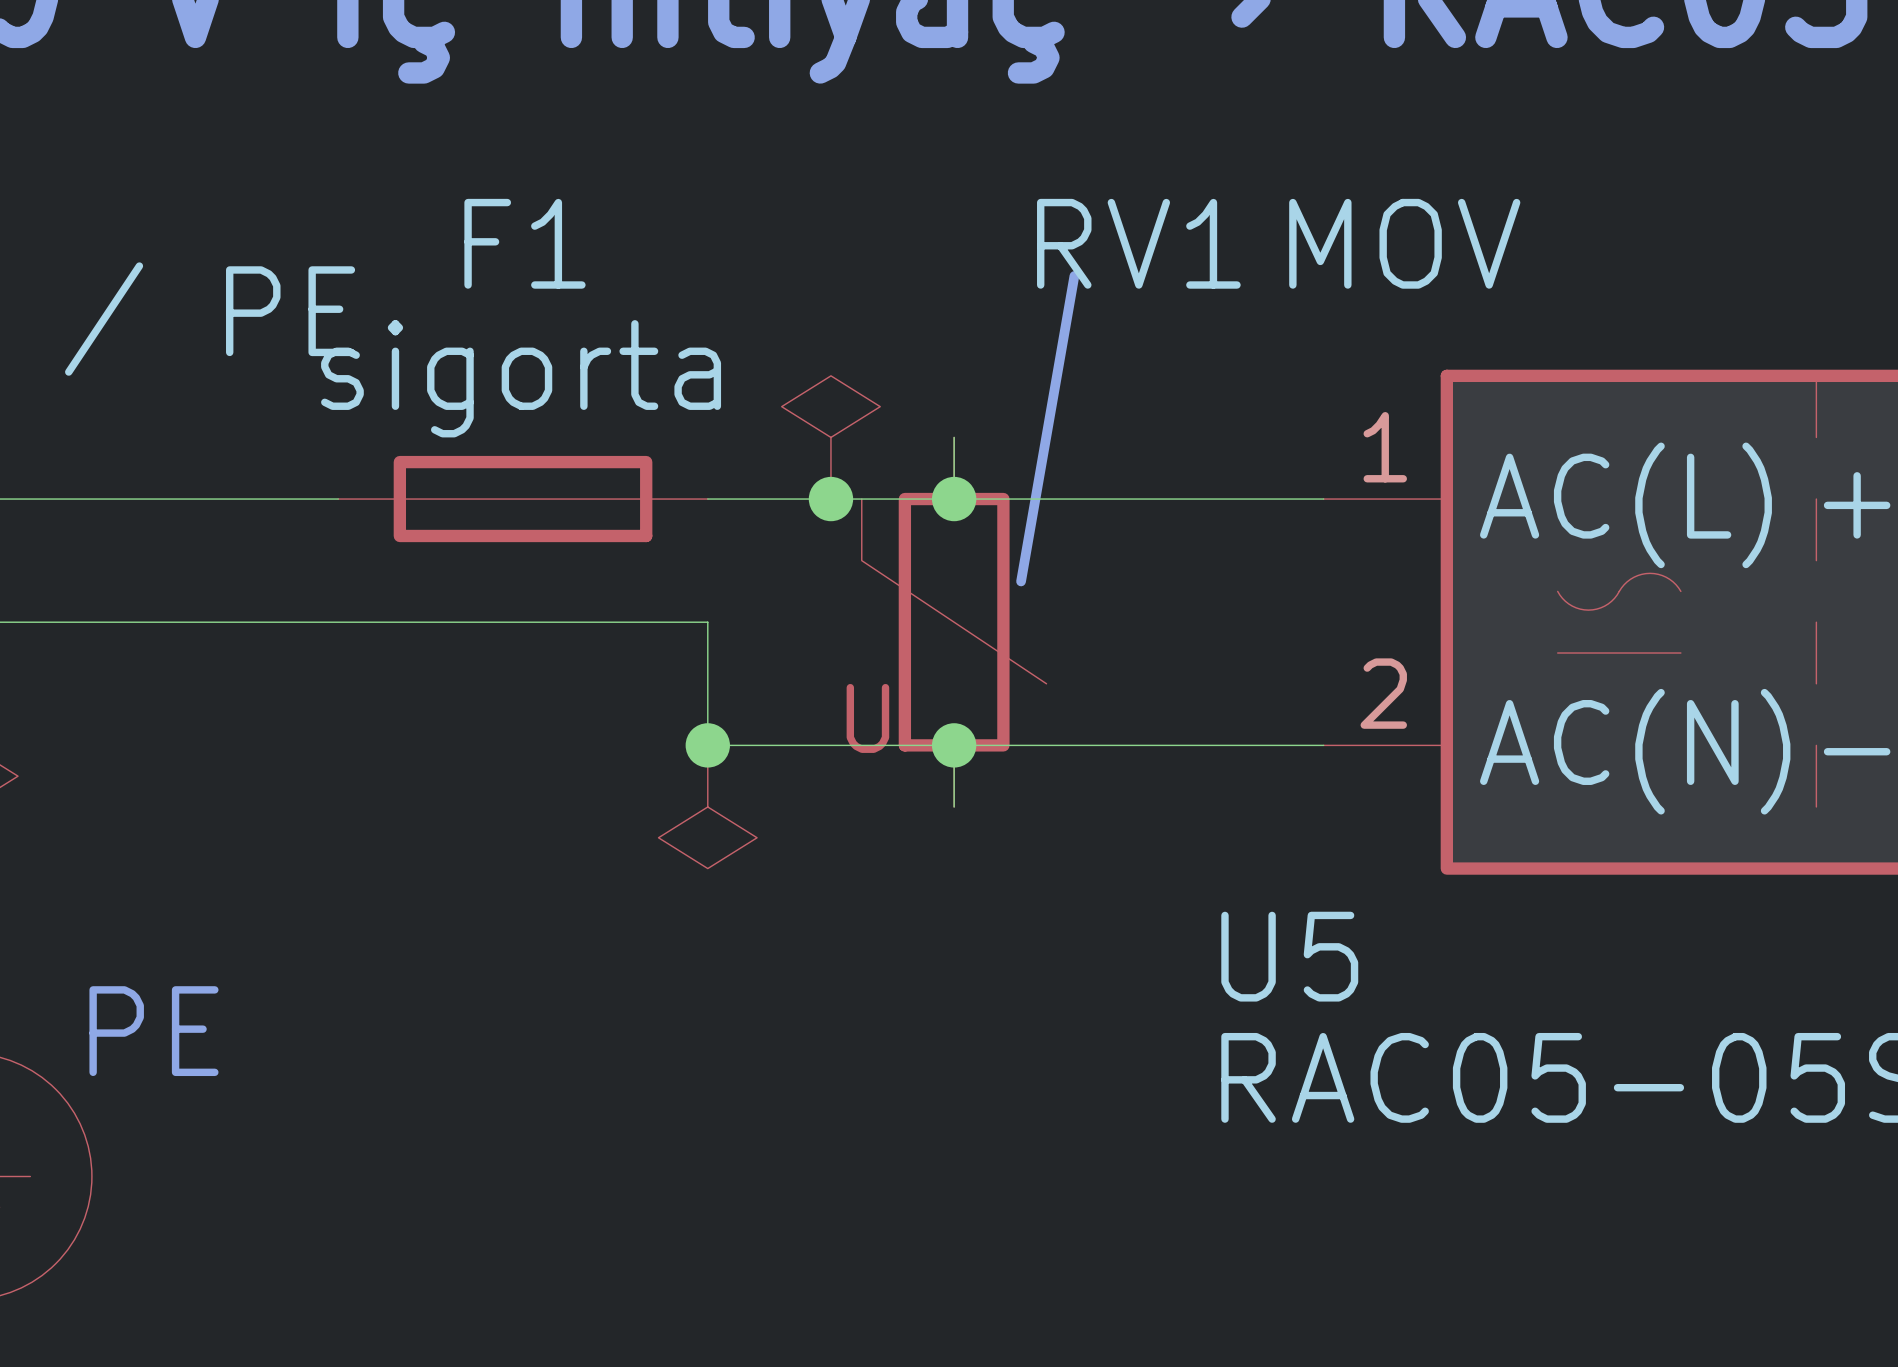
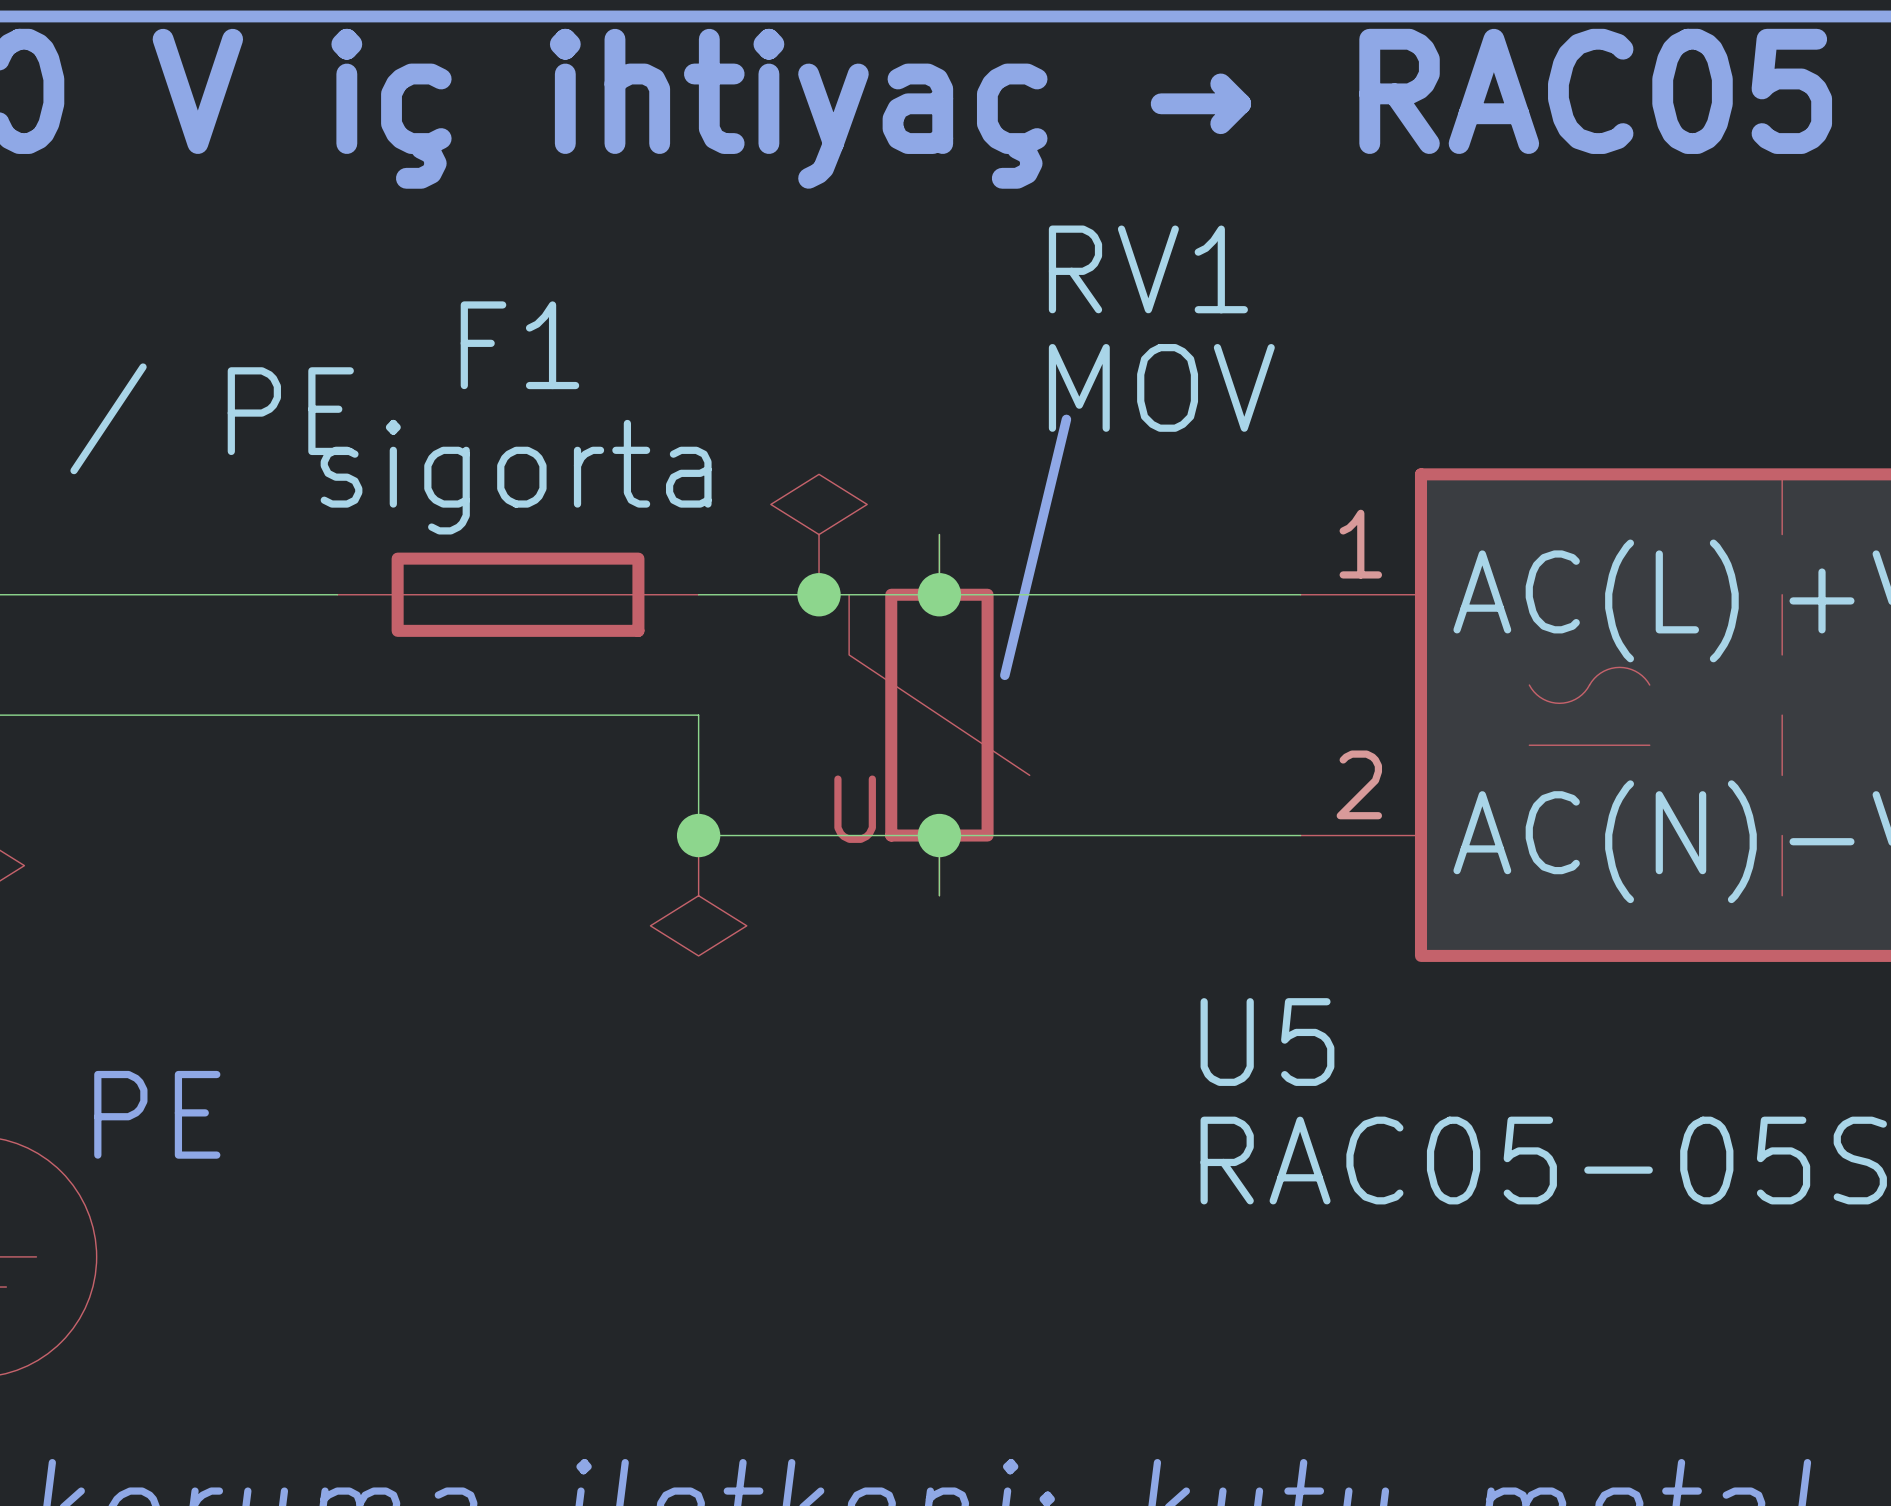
RV1 name position: RV1 (1138, 243) -> RV1 (1148, 269)
RV1 value position: MOV (1404, 243) -> MOV (1161, 387)
line: (1074, 275) (1021, 581) -> (1066, 419) (1004, 675)

